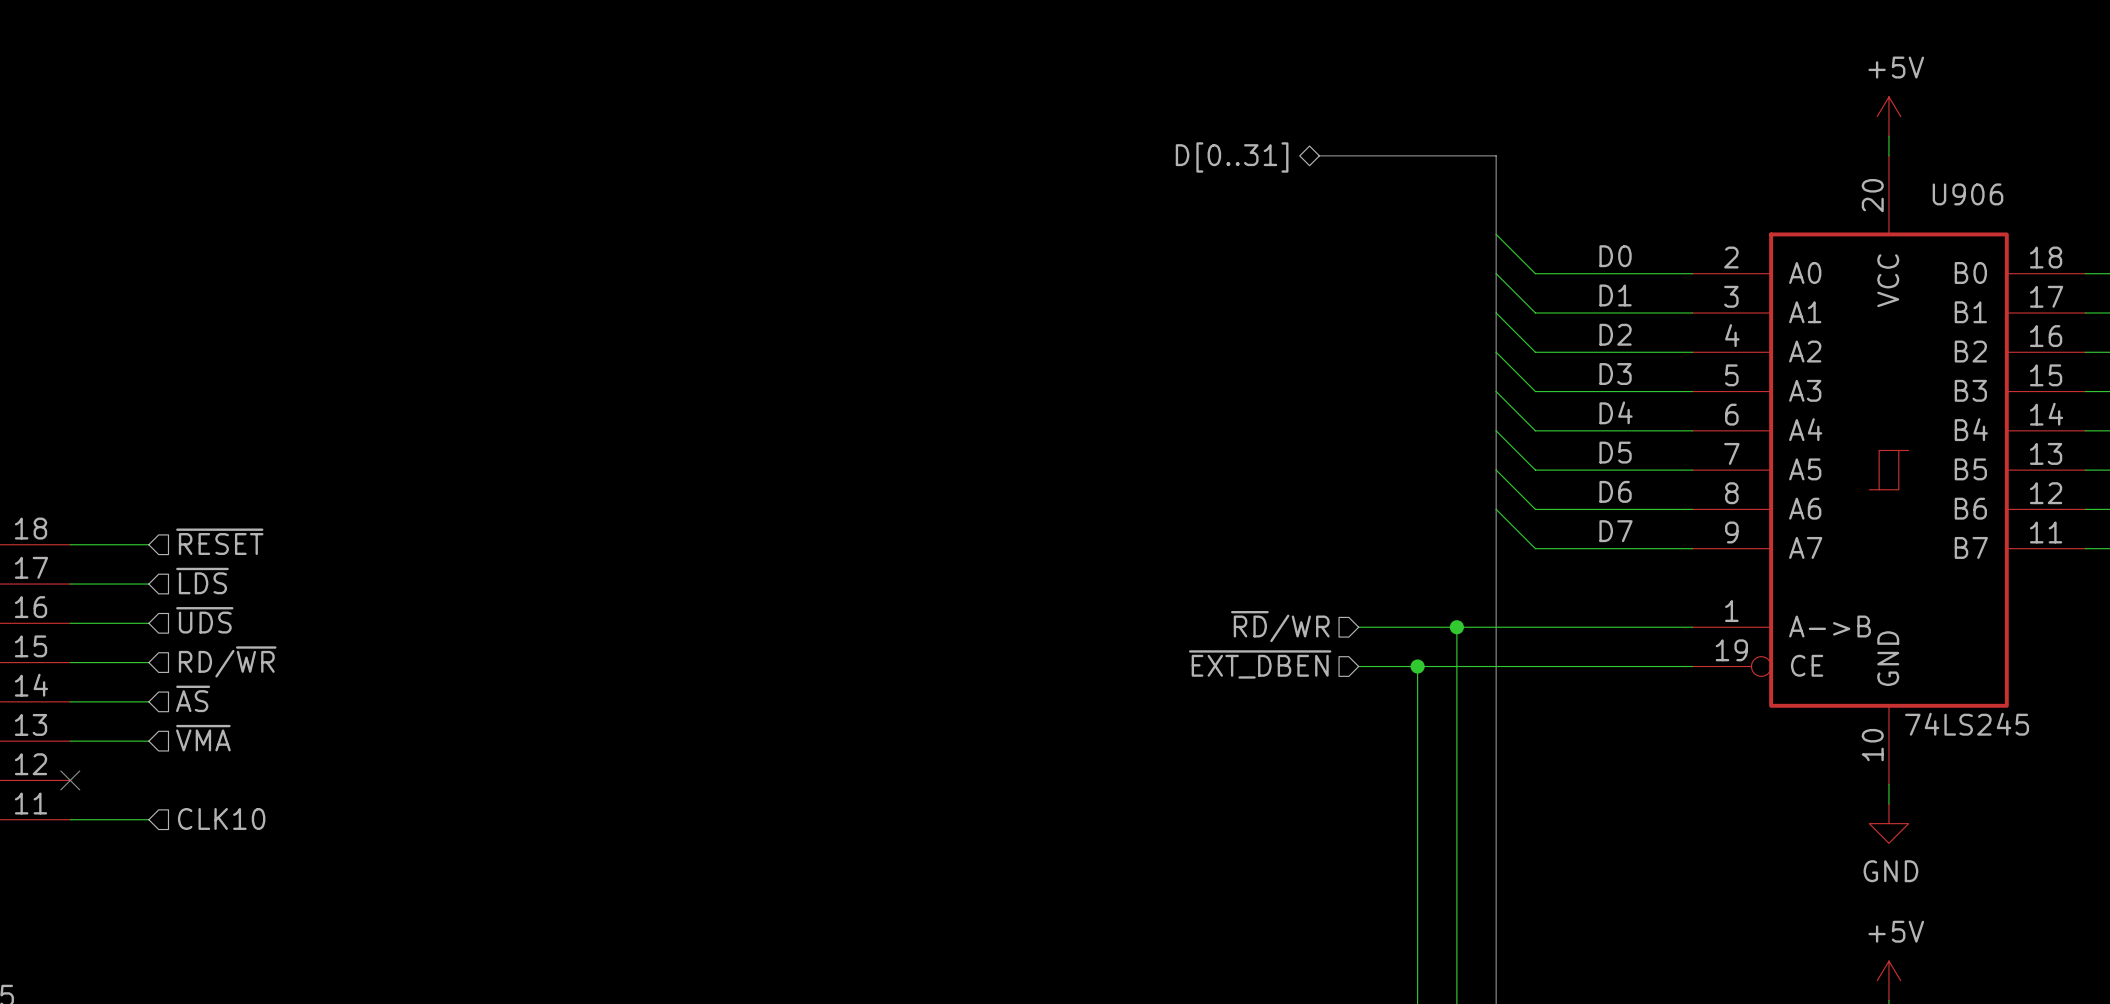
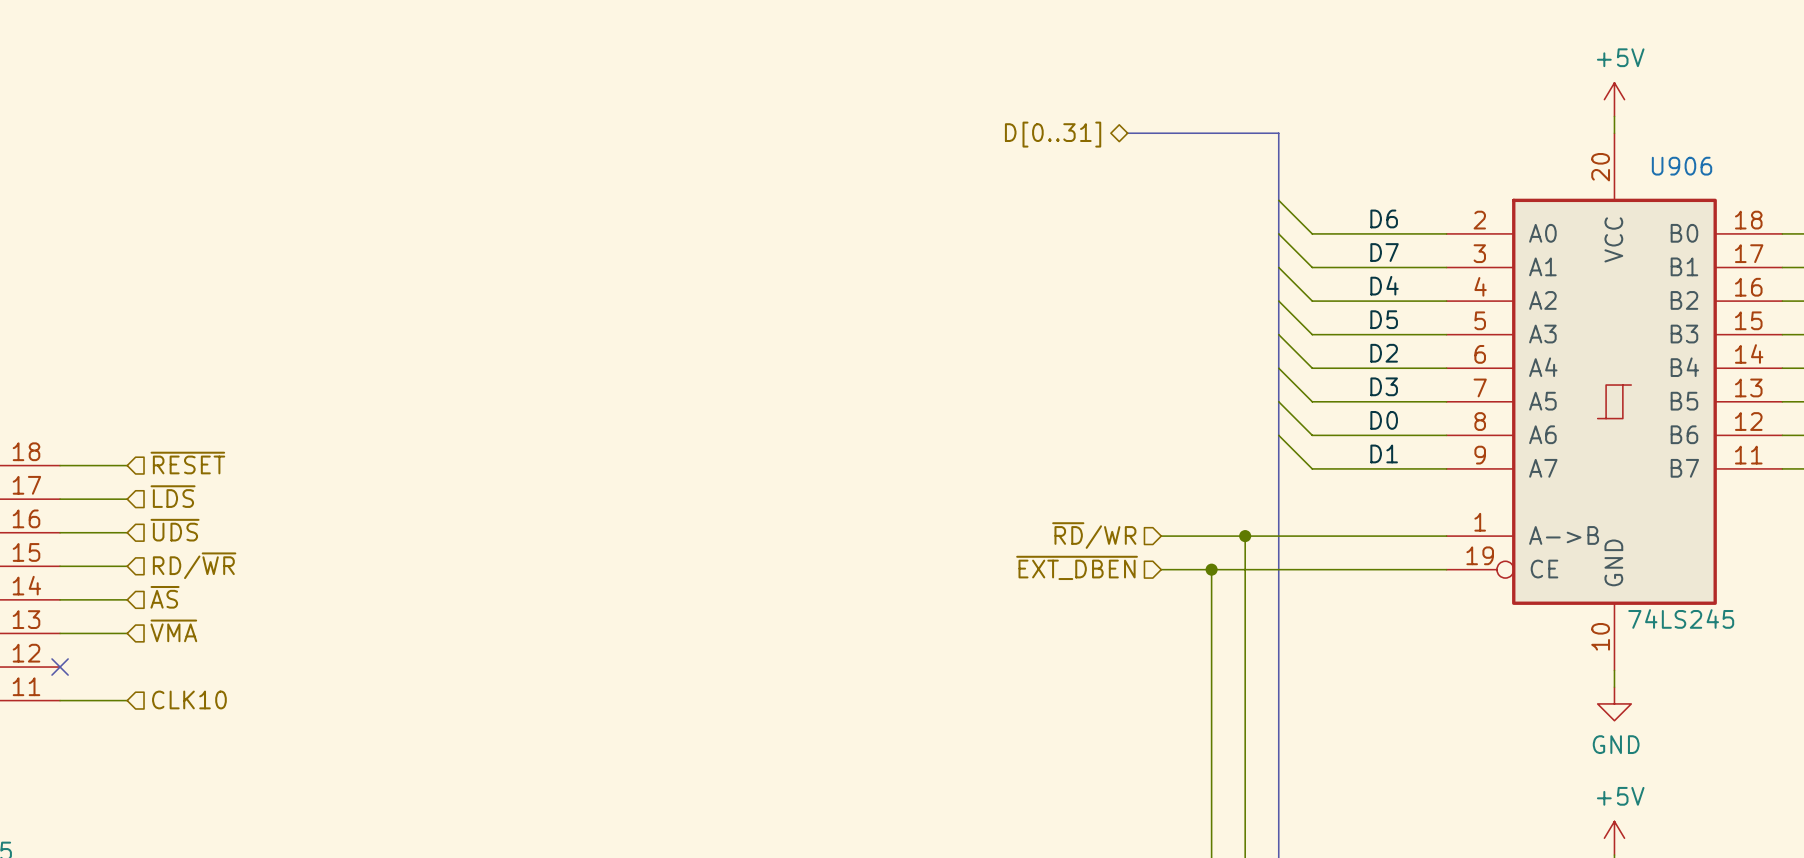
label position: D0 (1615, 256) -> D0 (1384, 420)
label position: D1 (1615, 295) -> D1 (1384, 453)
label position: D2 (1615, 334) -> D2 (1384, 353)
label position: D3 (1615, 374) -> D3 (1384, 386)
label position: D4 (1616, 412) -> D4 (1384, 285)
label position: D5 (1615, 452) -> D5 (1384, 319)
label position: D6 (1615, 491) -> D6 (1384, 218)
label position: D7 (1616, 531) -> D7 (1384, 252)

